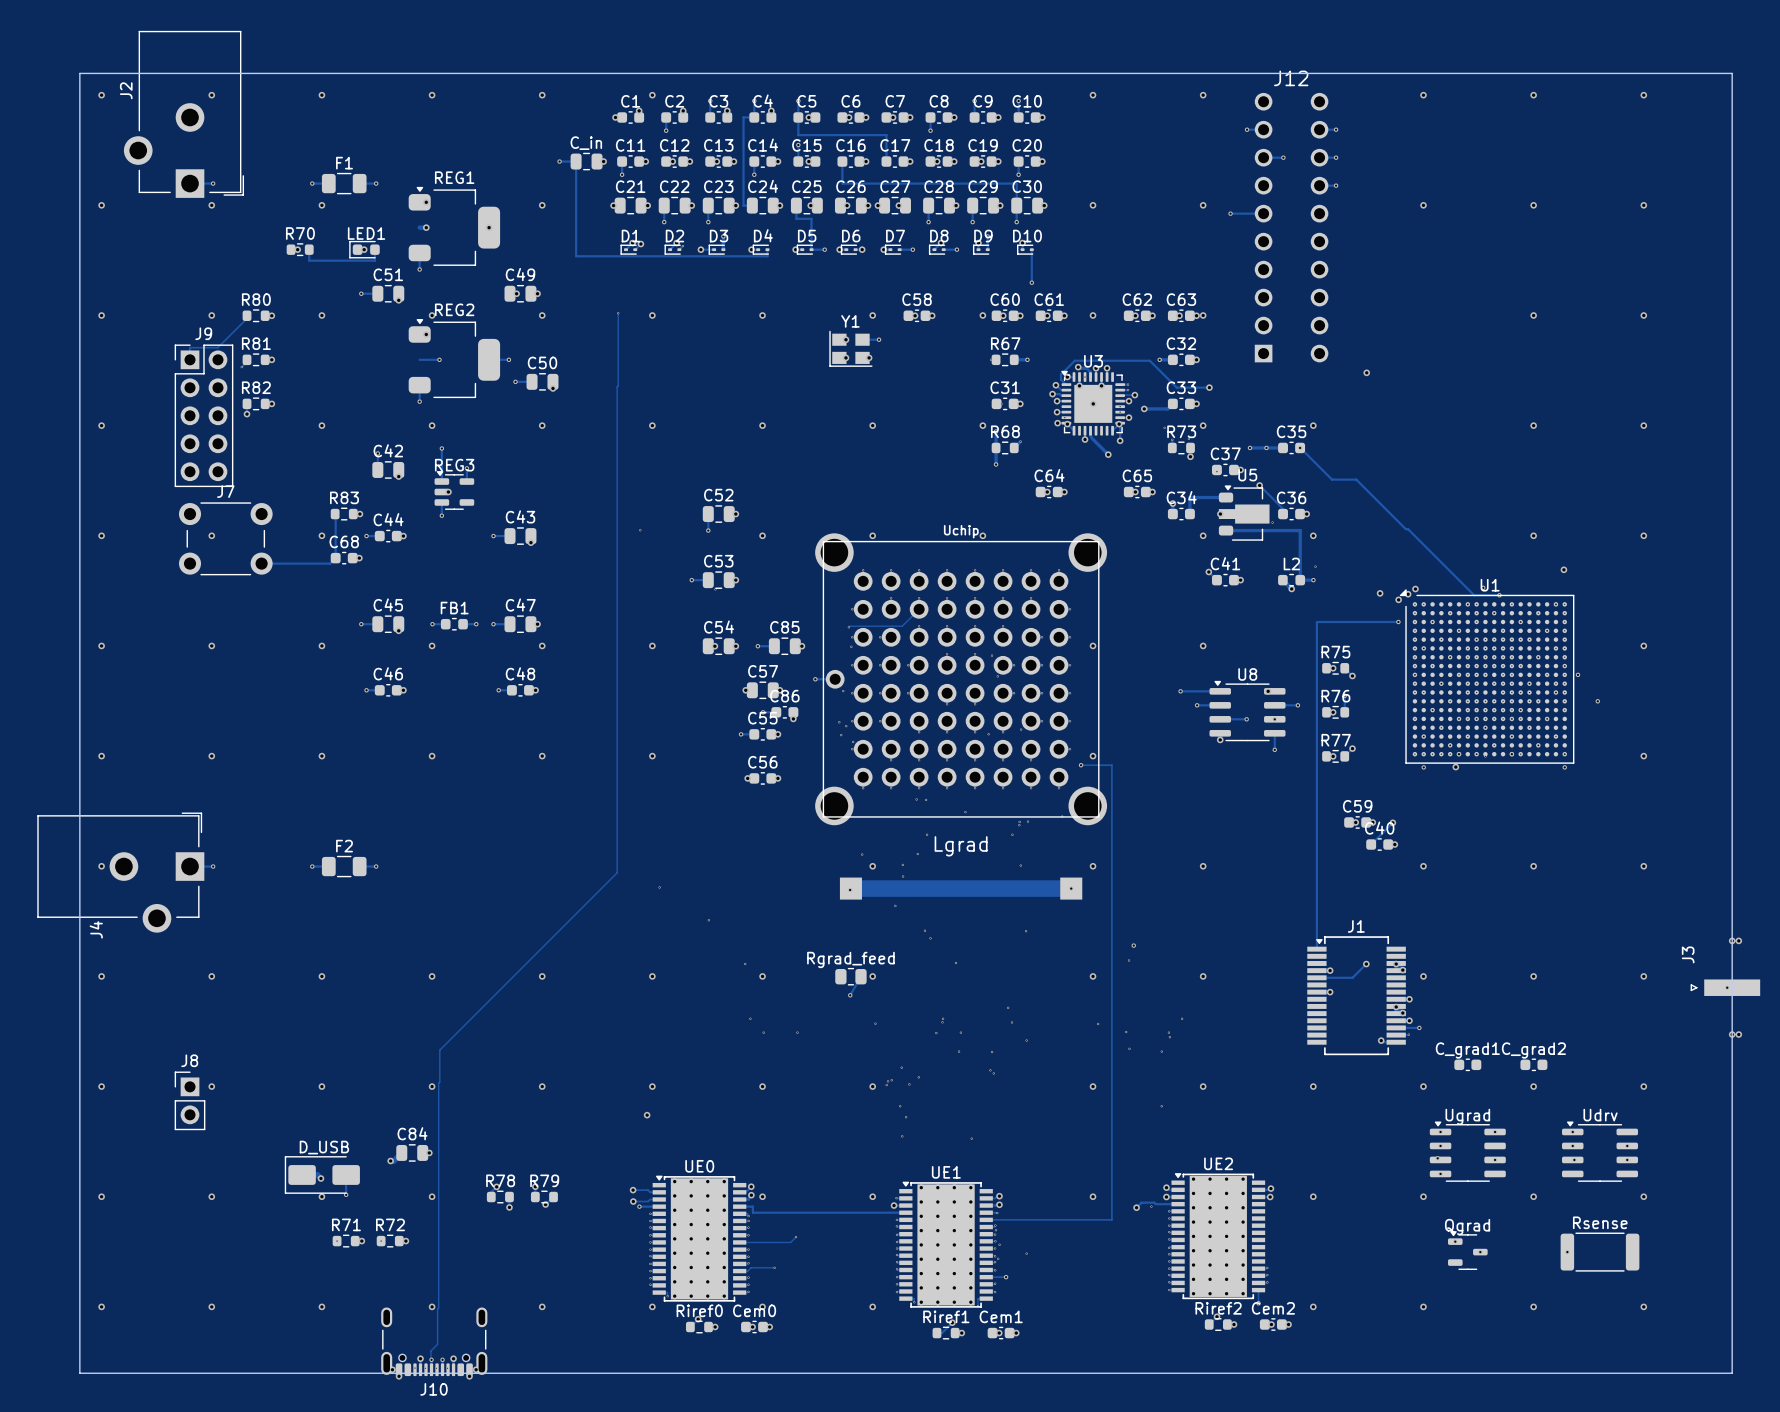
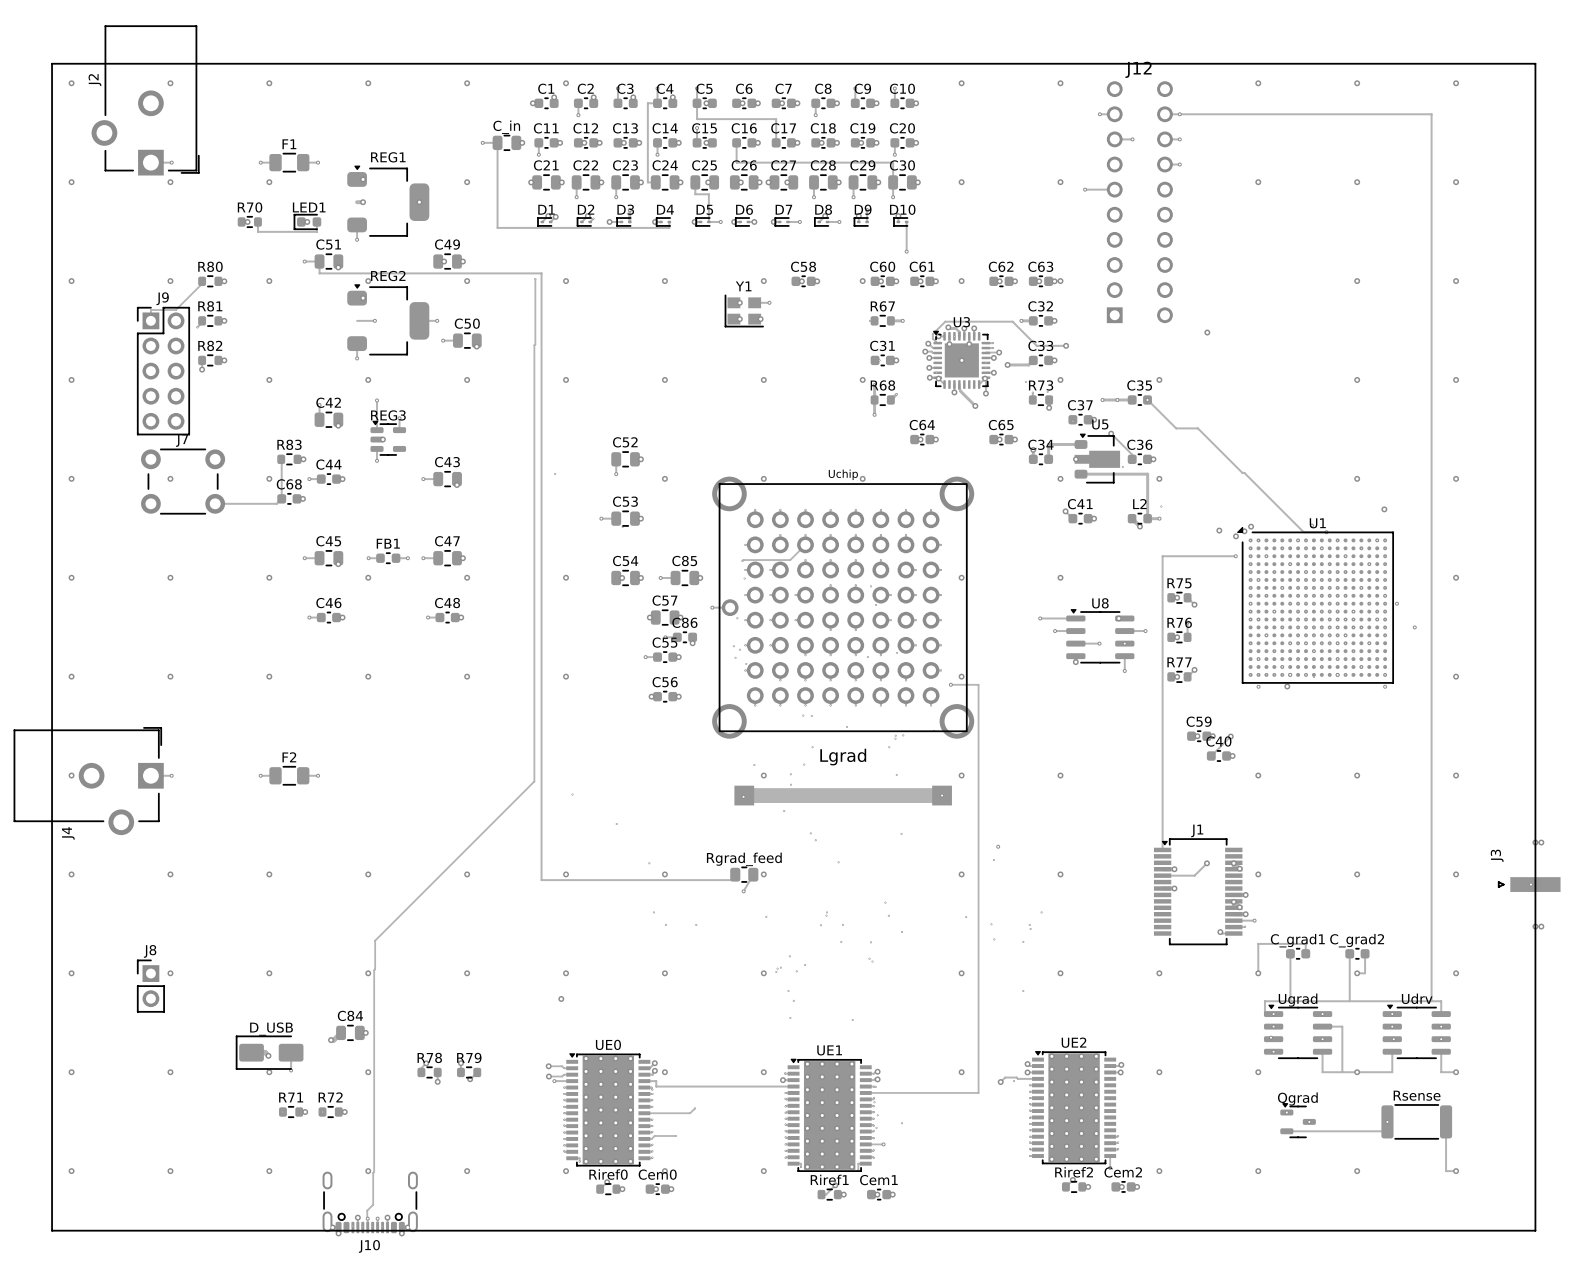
track: none -> (1179, 114) (1431, 114) (1431, 1001)
track: none -> (319, 261) (319, 273) (541, 273) (541, 880) (735, 880)
track: none -> (1290, 953) (1290, 1001)
track: none -> (1305, 953) (1305, 943) (1258, 943) (1258, 973)
track: none -> (1349, 953) (1349, 1001)
track: none -> (1365, 953) (1365, 973) (1357, 973)
track: none -> (1273, 1014) (1264, 1014) (1264, 1001) (1441, 1001) (1441, 1014)
track: none -> (1322, 1026) (1342, 1026) (1342, 1072)
track: none -> (1322, 1051) (1322, 1072) (1392, 1072) (1392, 1051)
track: none -> (1441, 1051) (1441, 1072) (1456, 1072)
track: none -> (1387, 1121) (1387, 1131) (1286, 1131)
track: none -> (1446, 1121) (1446, 1171) (1456, 1171)

